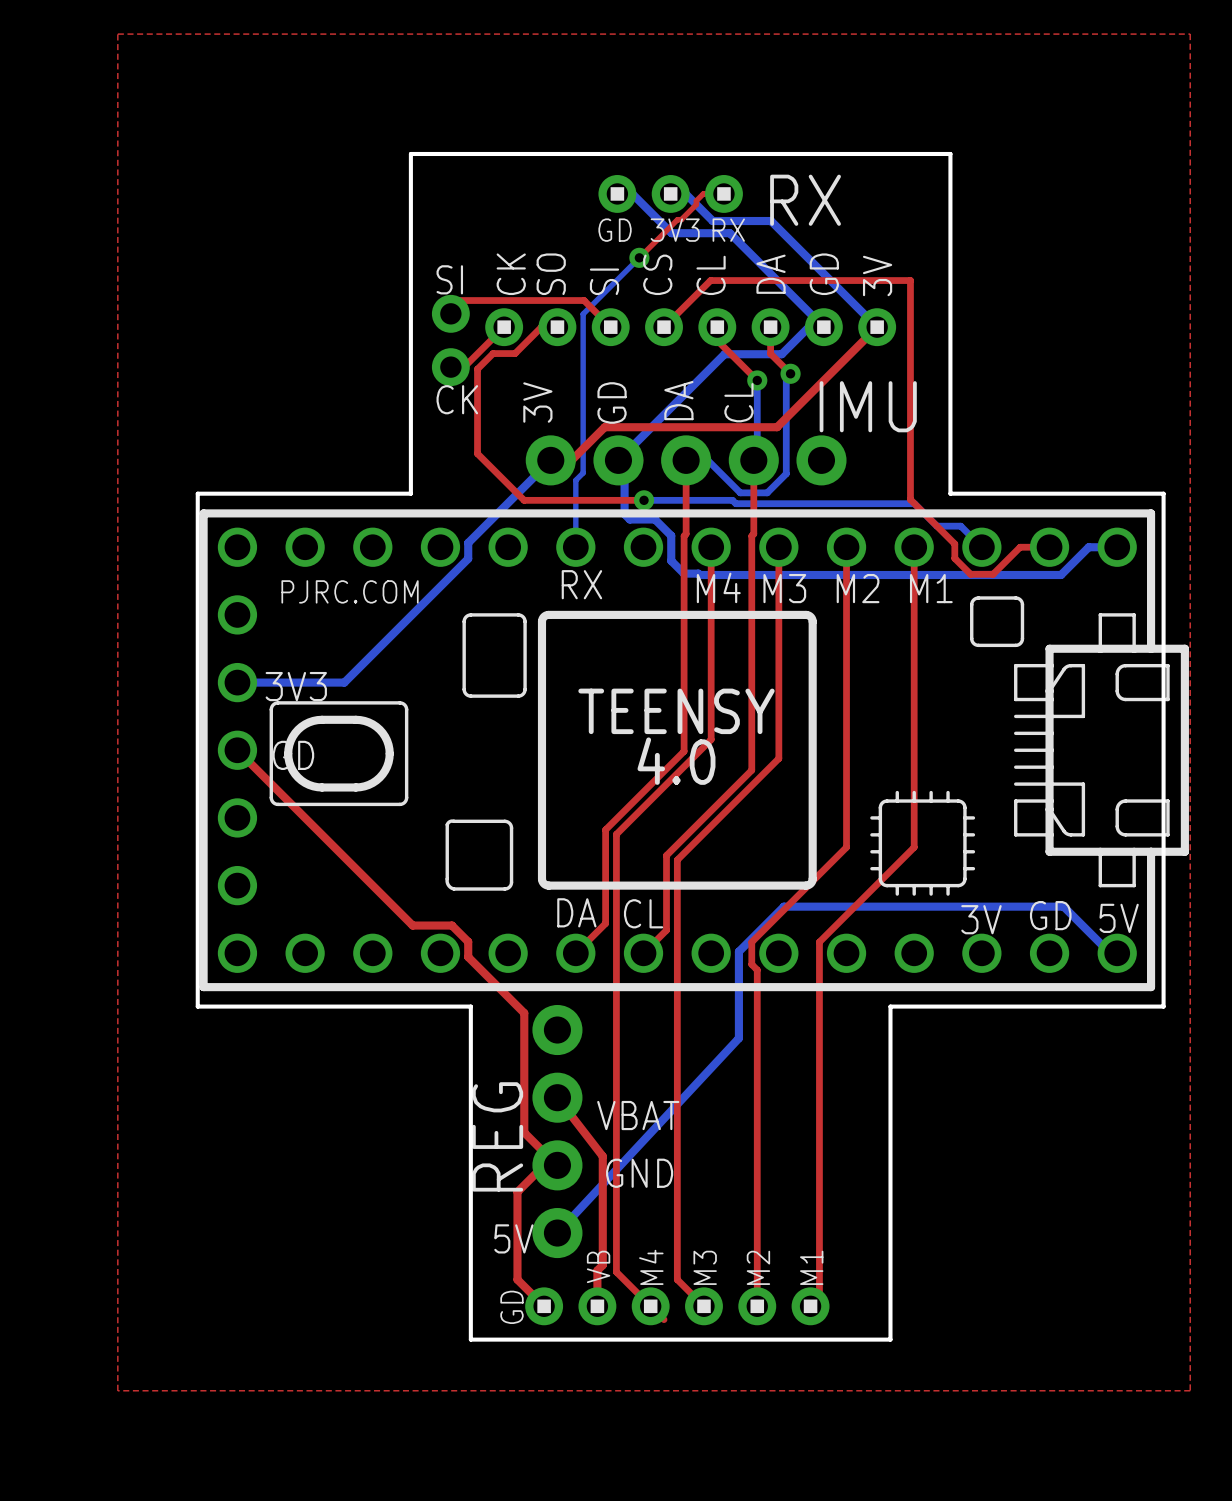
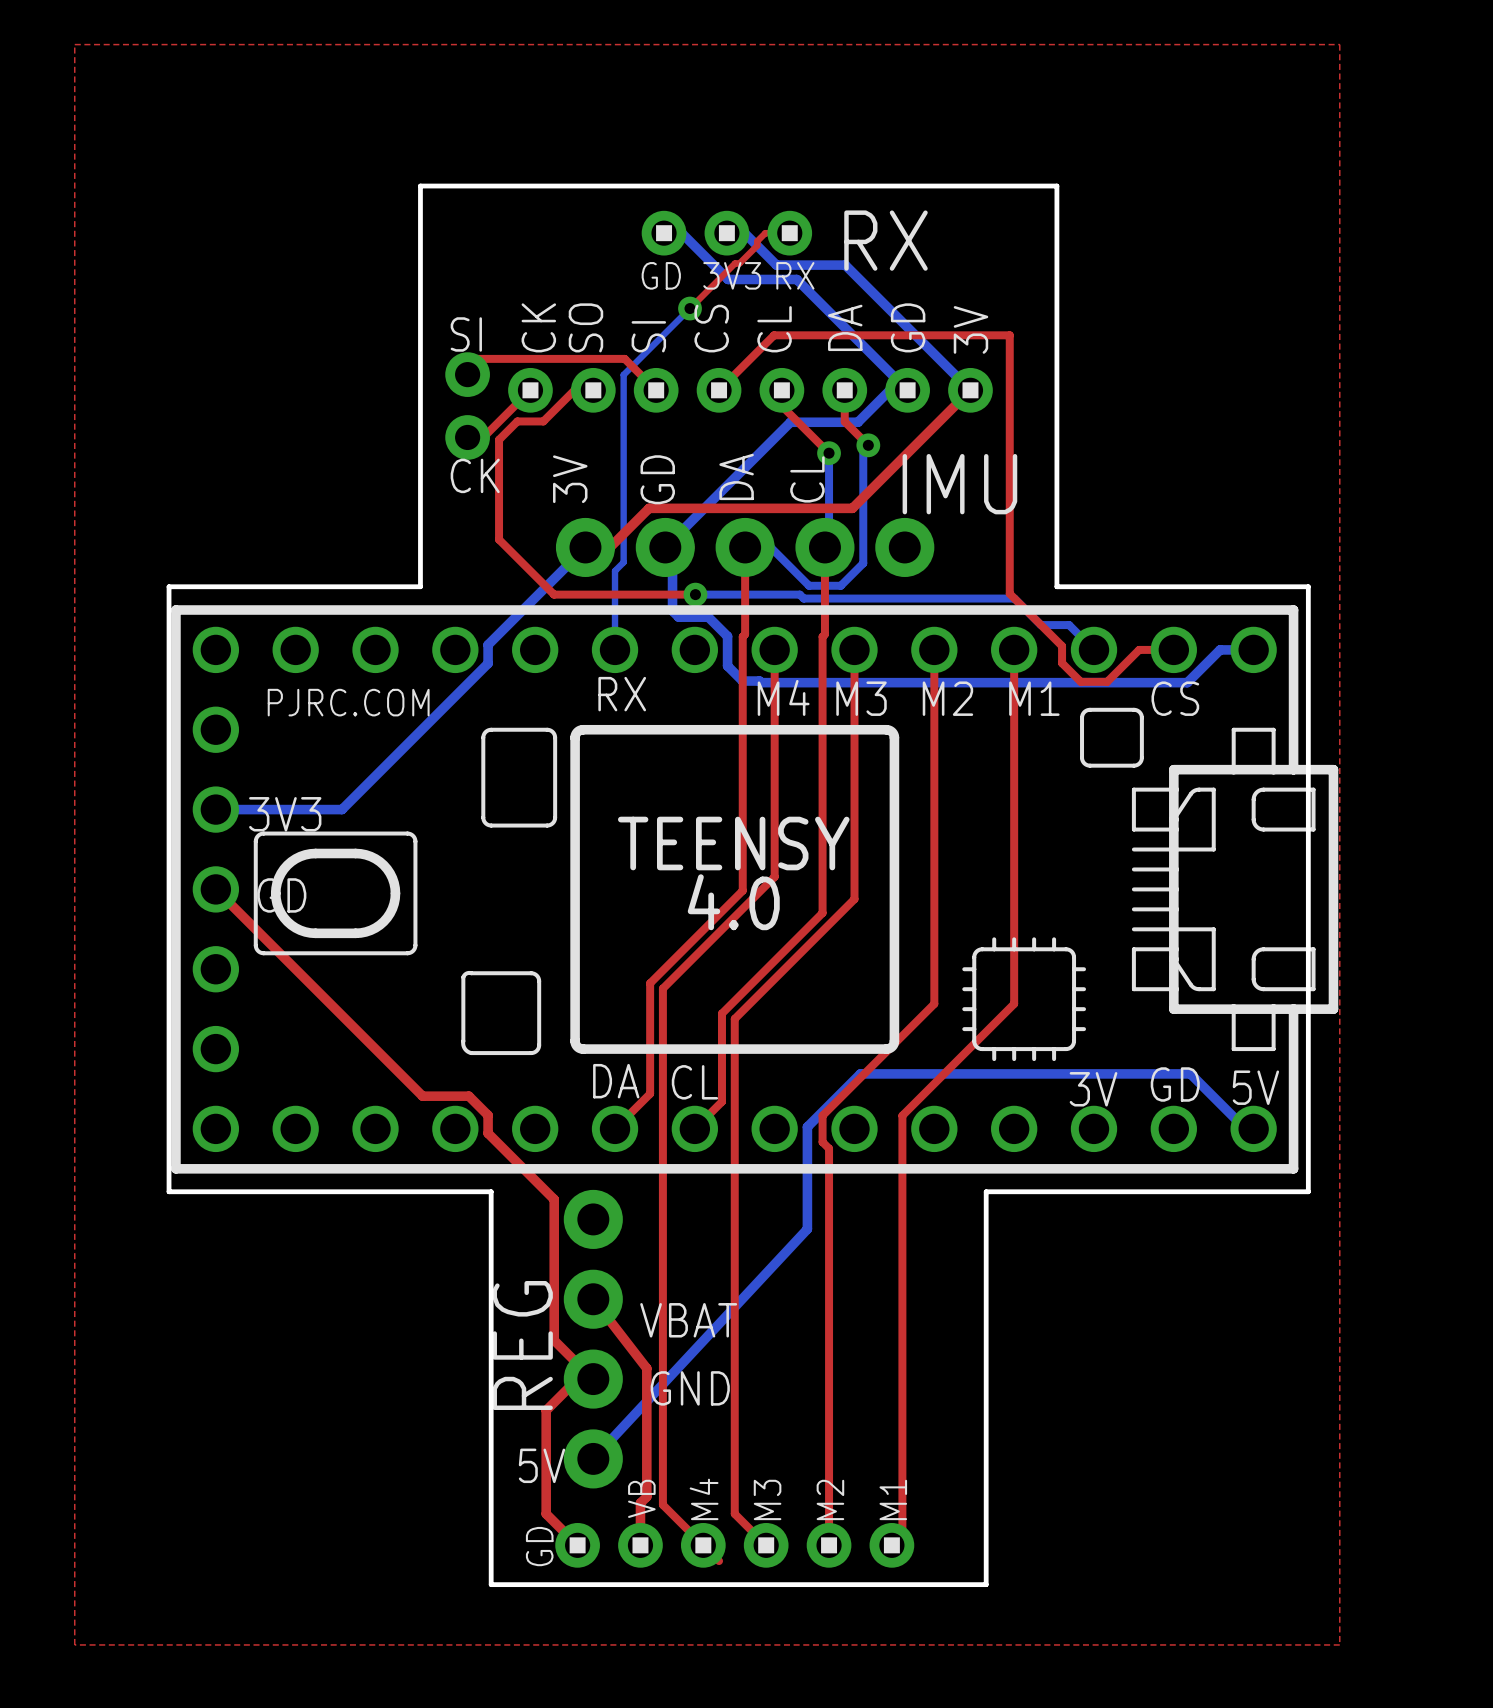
text: none -> CS (1175, 698)

